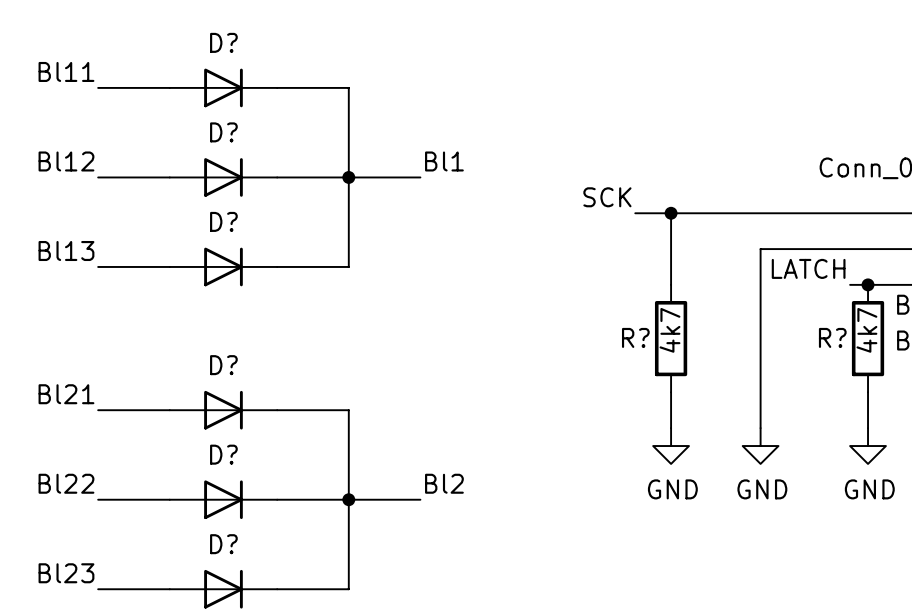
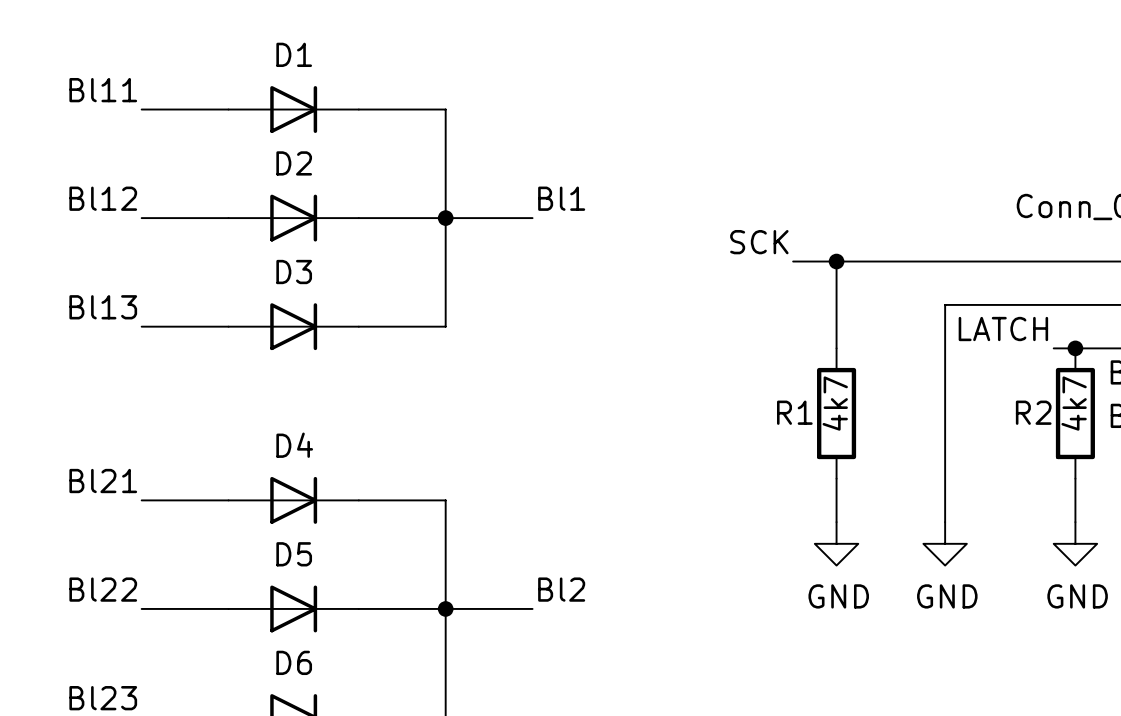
D? name: D? (223, 42) -> D1 (294, 54)
D? name: D? (223, 132) -> D2 (294, 163)
D? name: D? (223, 221) -> D3 (294, 272)
R? name: R? (635, 337) -> R1 (794, 412)
R? name: R? (832, 337) -> R2 (1033, 412)
D? name: D? (223, 365) -> D4 (294, 445)
D? name: D? (223, 454) -> D5 (294, 554)
D? name: D? (223, 544) -> D6 (294, 662)

